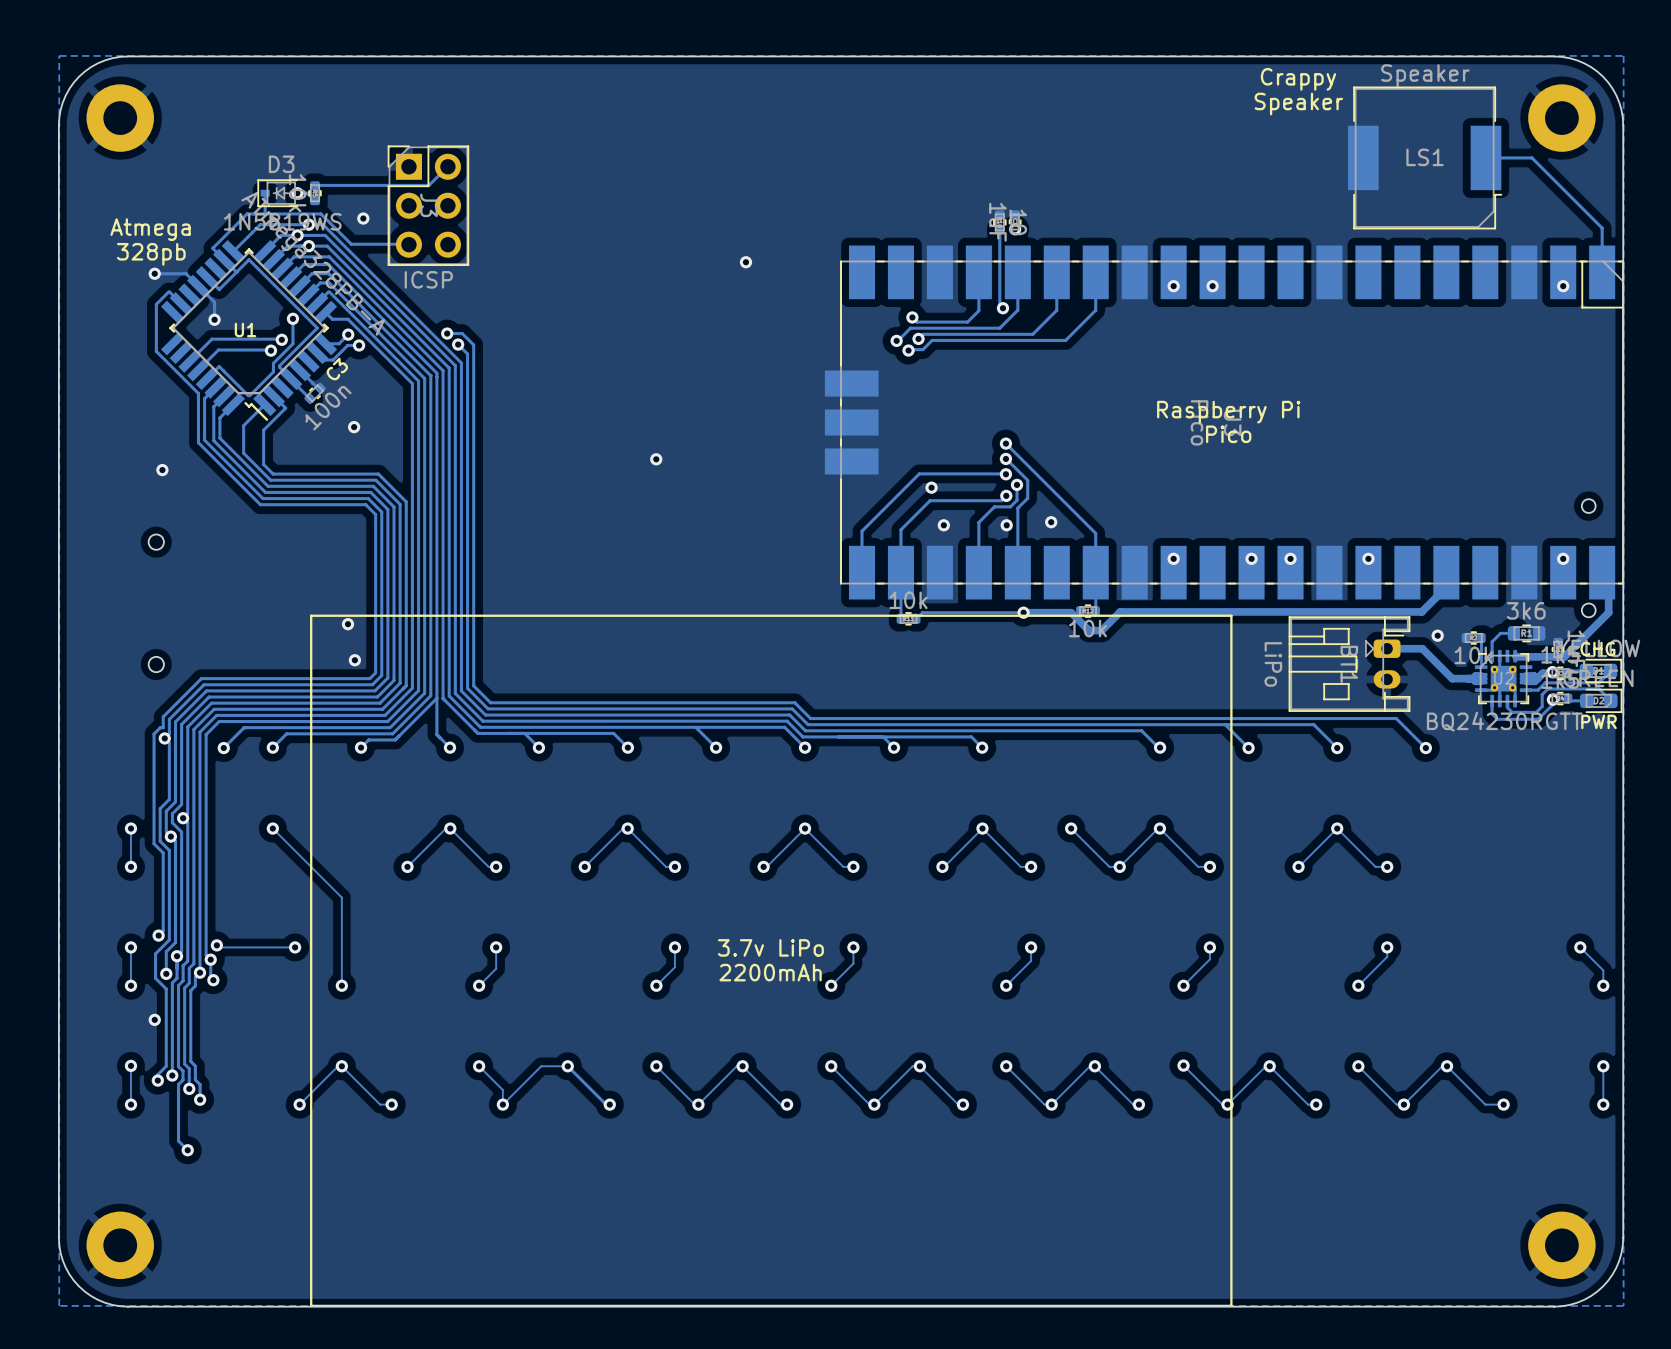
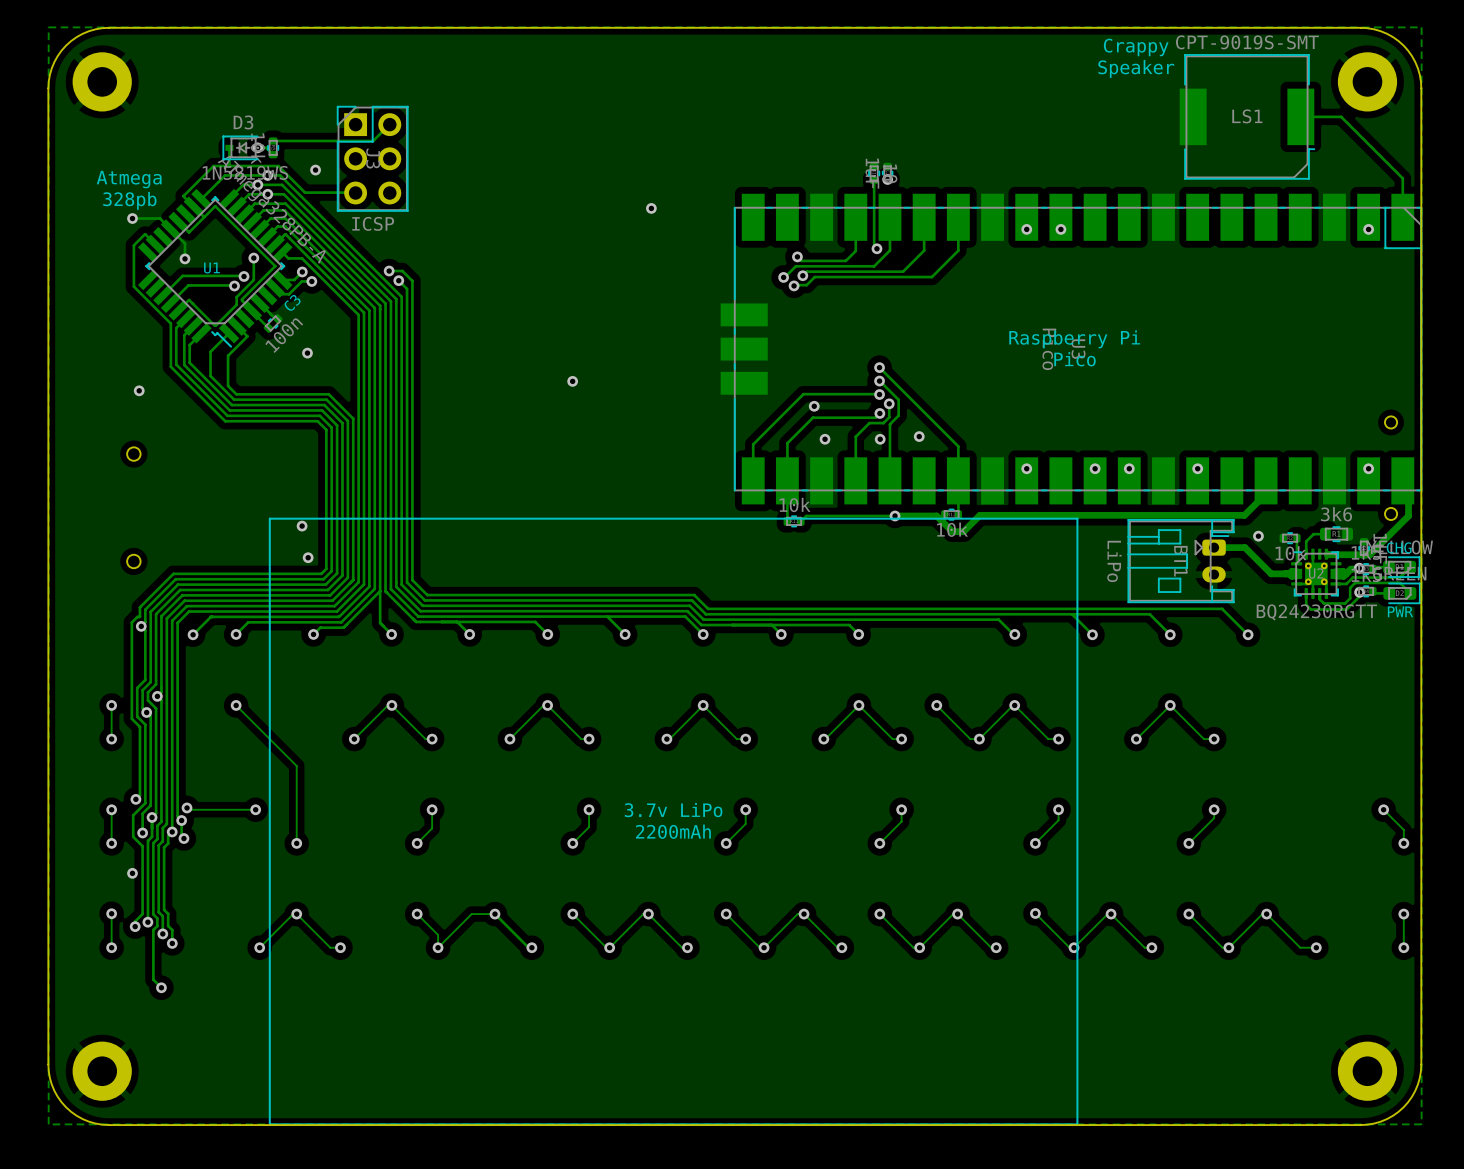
LS1 value: Speaker (1425, 75) -> CPT-9019S-SMT (1247, 42)

